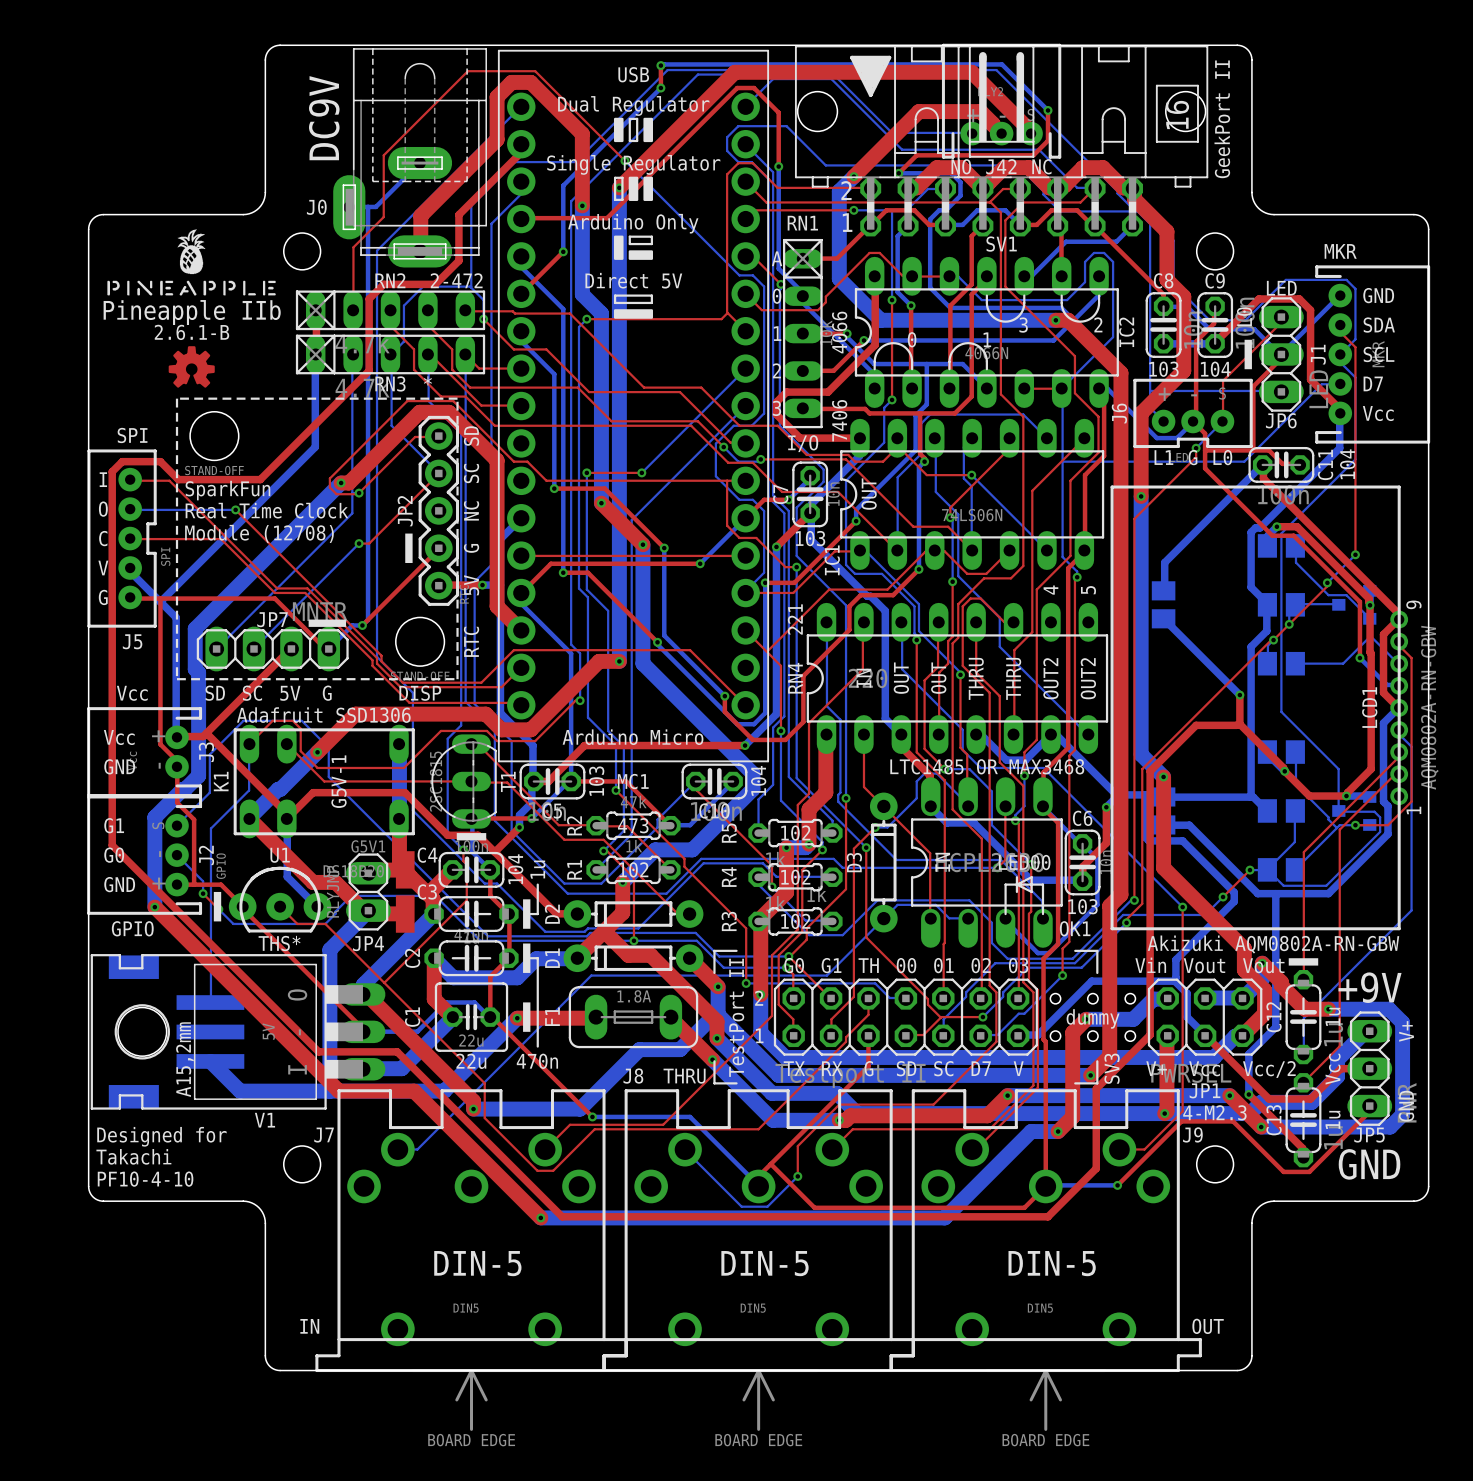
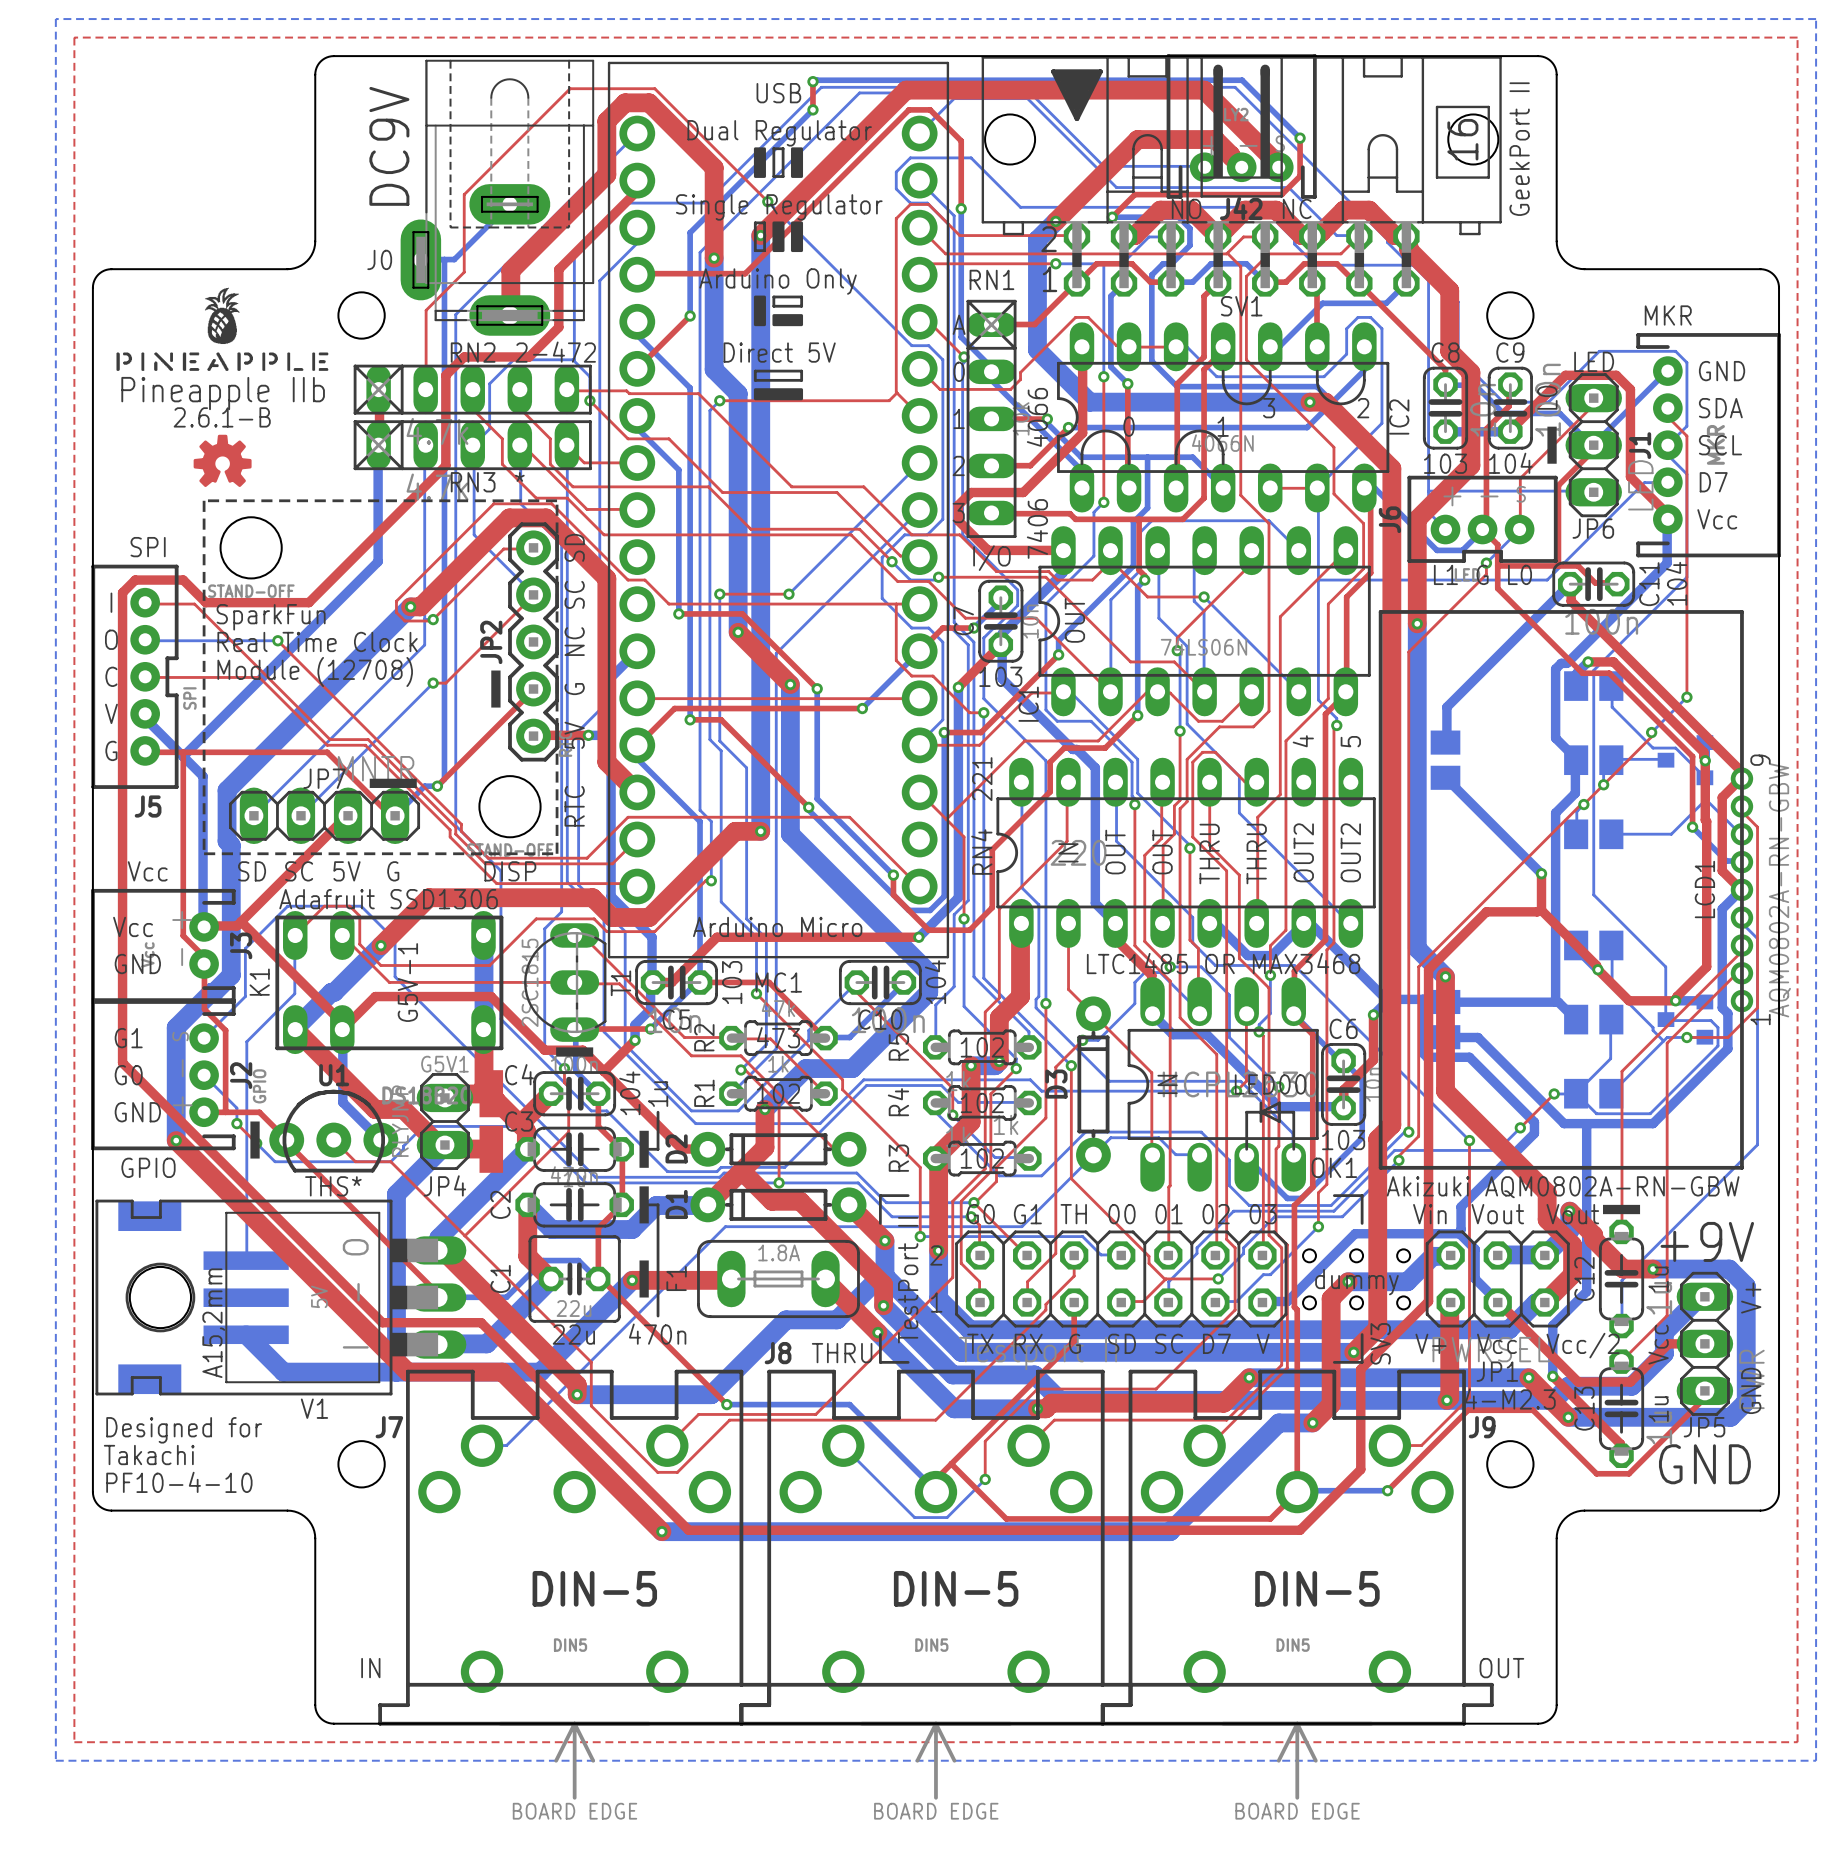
bottom zone outline: none -> (55, 19) (1816, 19) (1816, 1760) (55, 1760) (55, 19)
top zone outline: none -> (74, 37) (1797, 37) (1797, 1742) (74, 1742) (74, 37)

